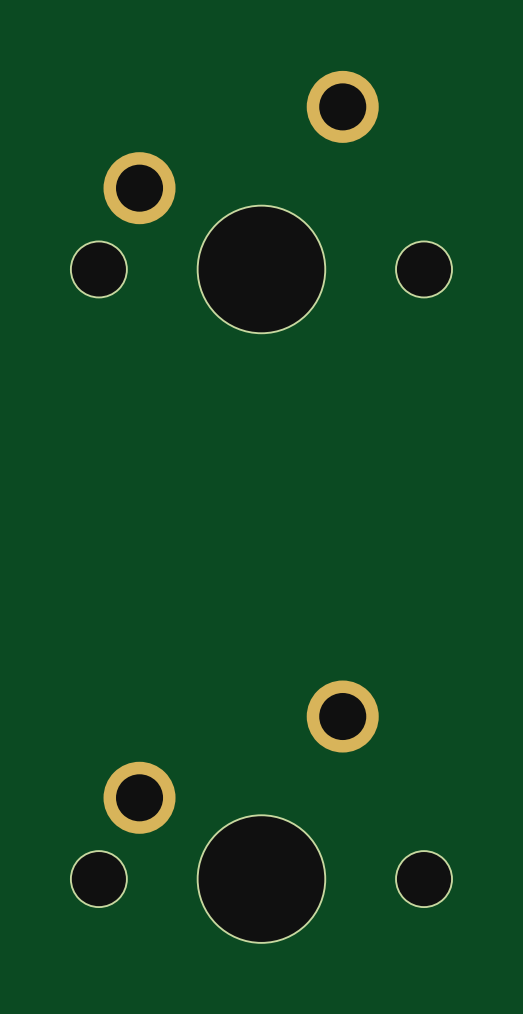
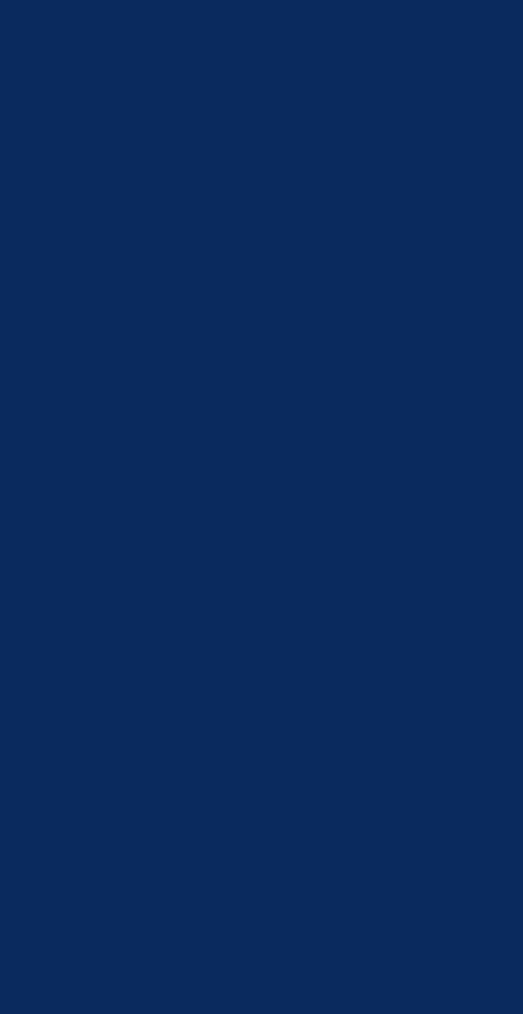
part: (261, 202) -> none
part: (261, 811) -> none

